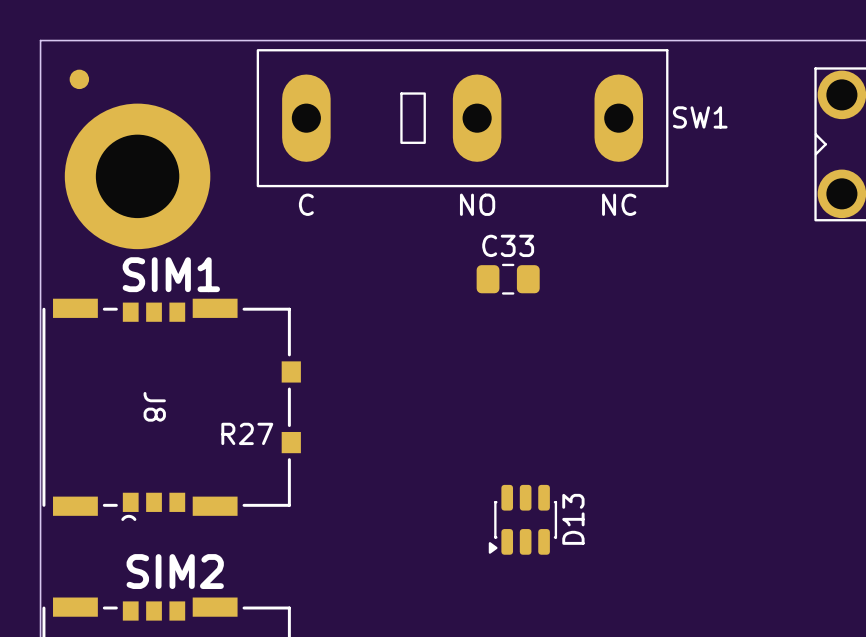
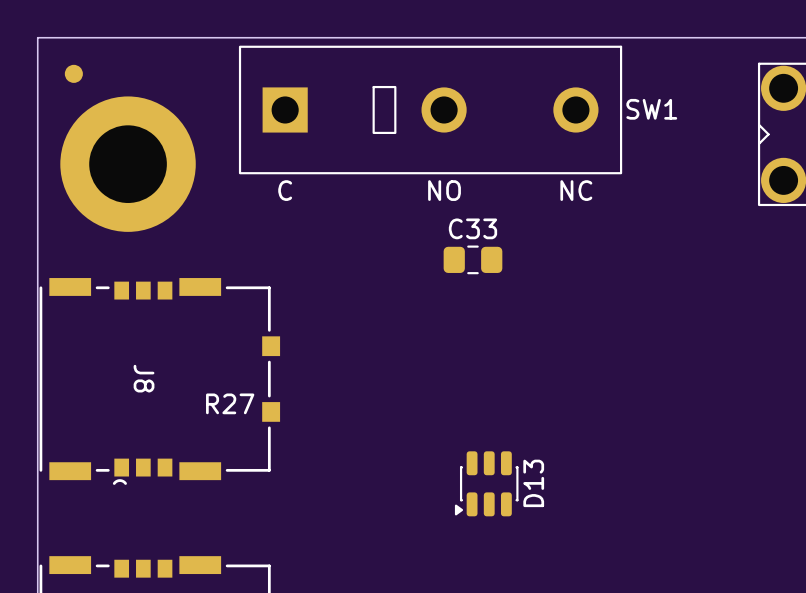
SW1 footprint: [256, 49, 669, 188] -> [238, 45, 623, 175]
text: SIM1 (171, 274) -> none
text: SIM2 (175, 571) -> none

